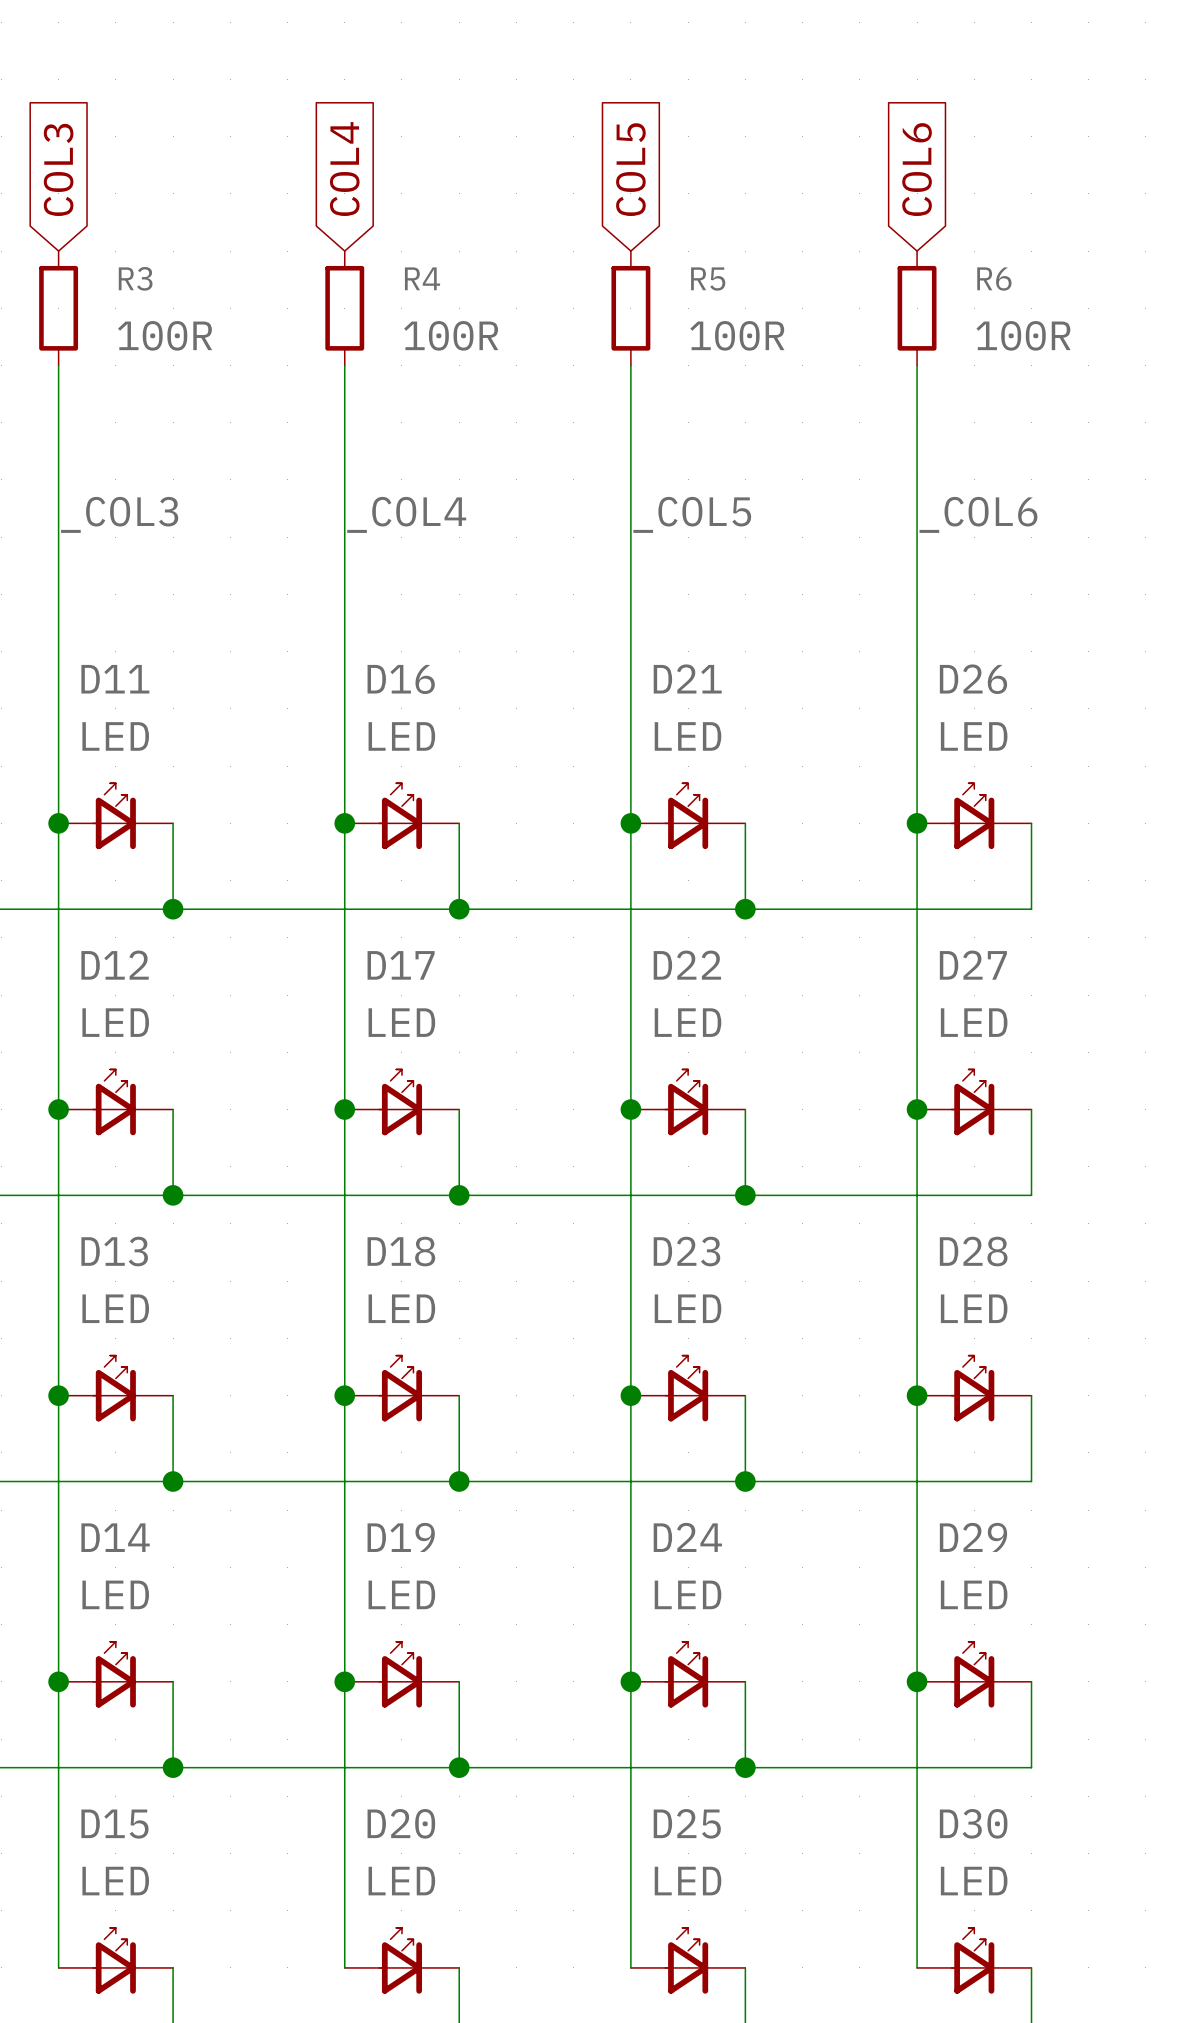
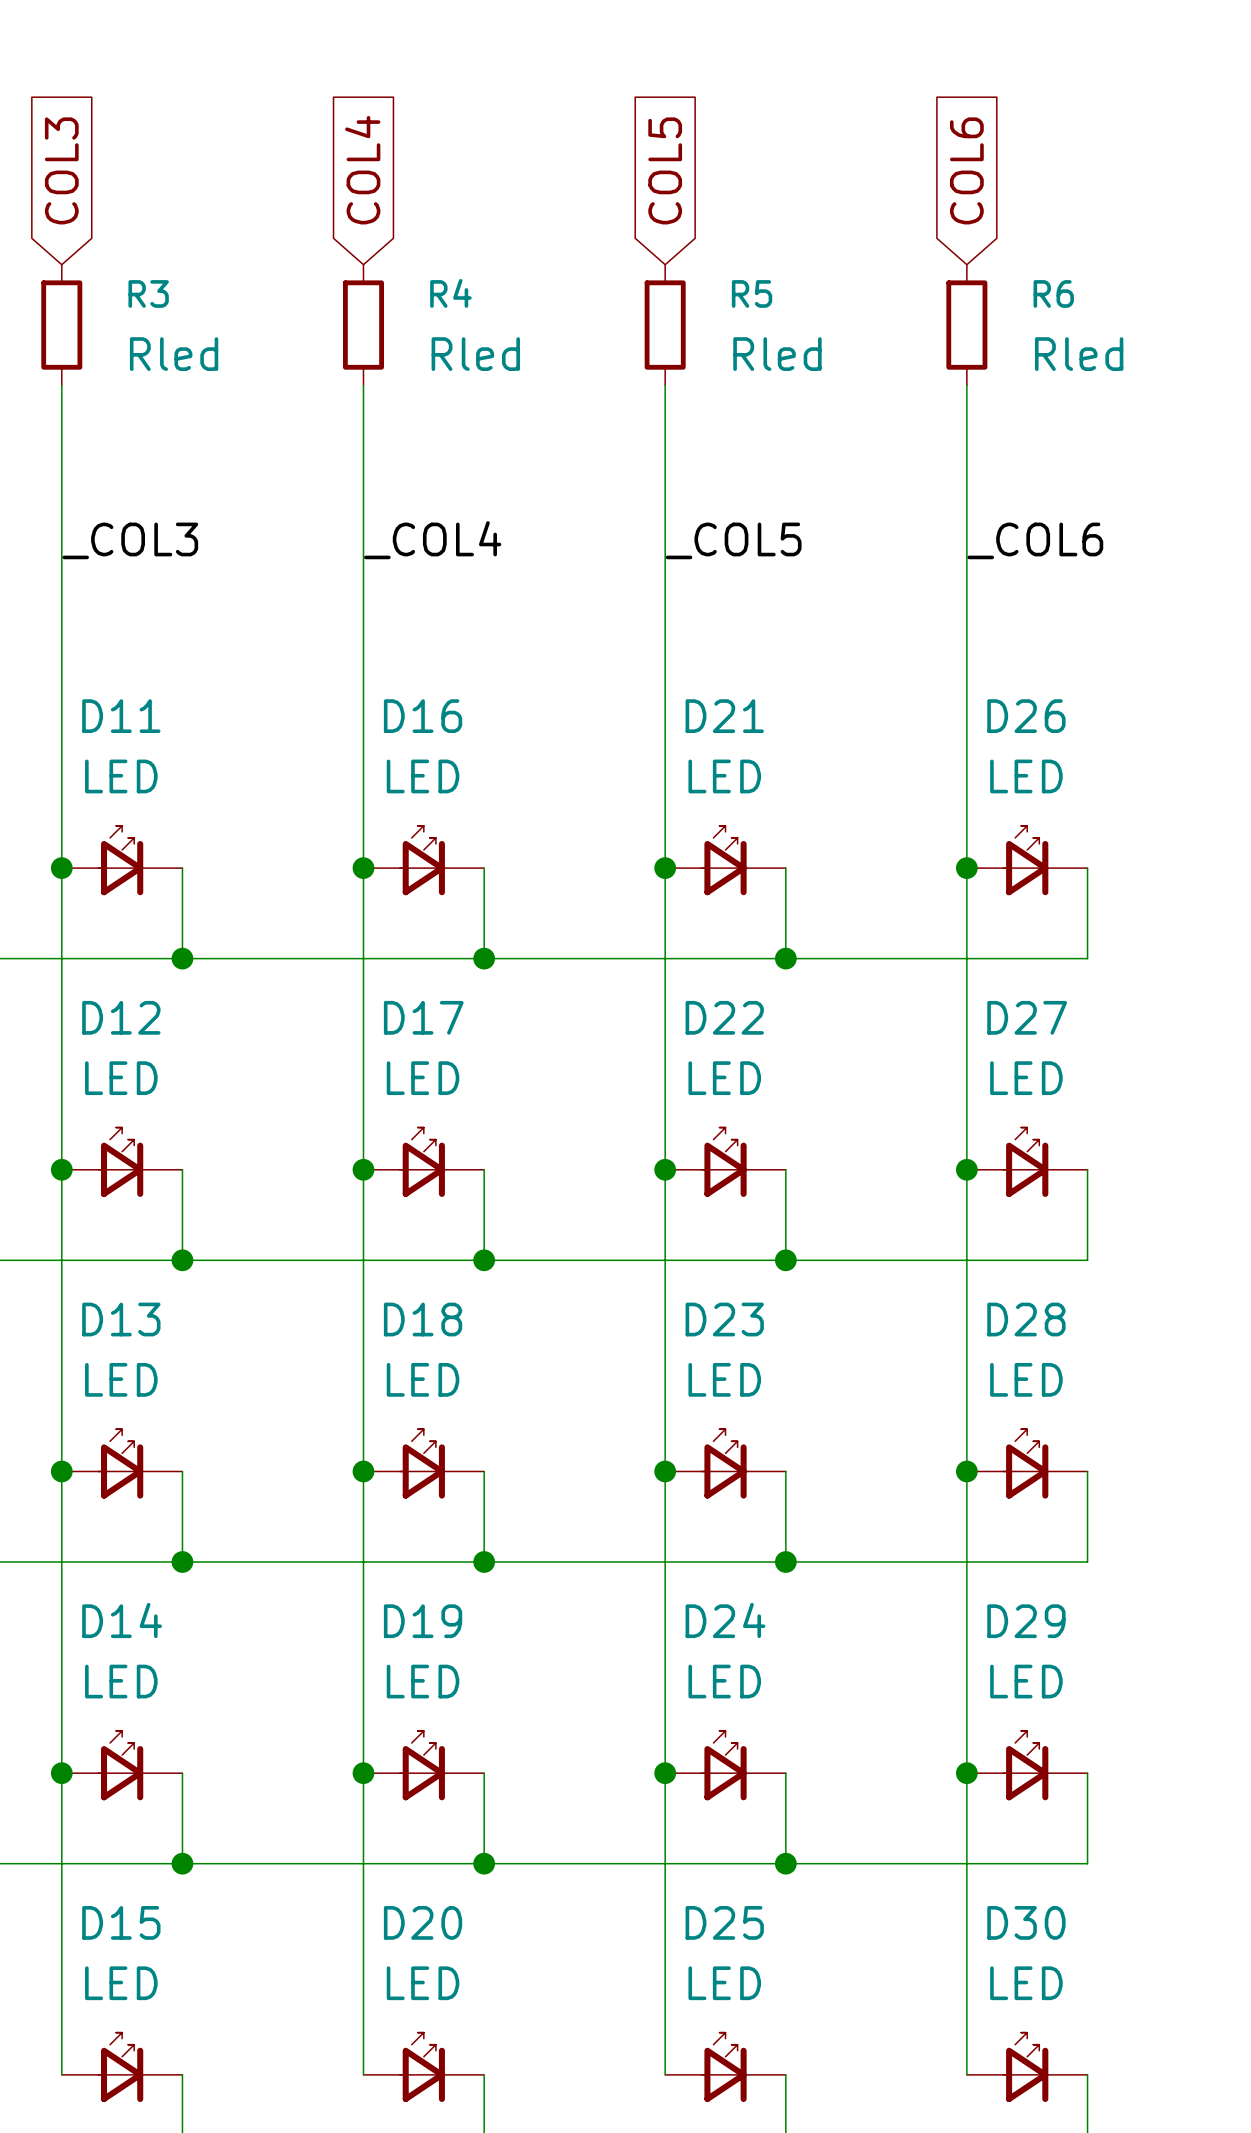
R3 value: 100R (165, 335) -> Rled (174, 354)
R4 value: 100R (451, 335) -> Rled (475, 354)
R5 value: 100R (737, 335) -> Rled (777, 354)
R6 value: 100R (1023, 335) -> Rled (1079, 354)

